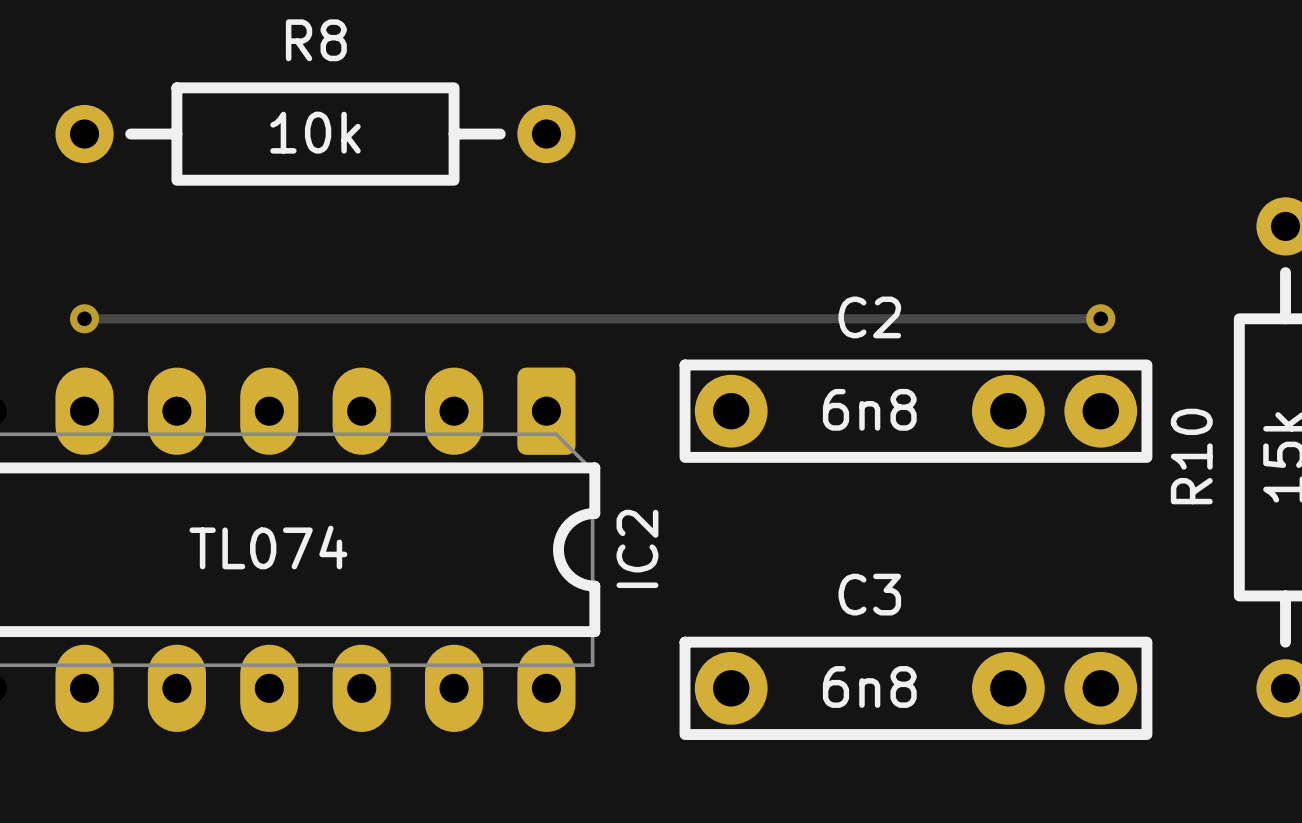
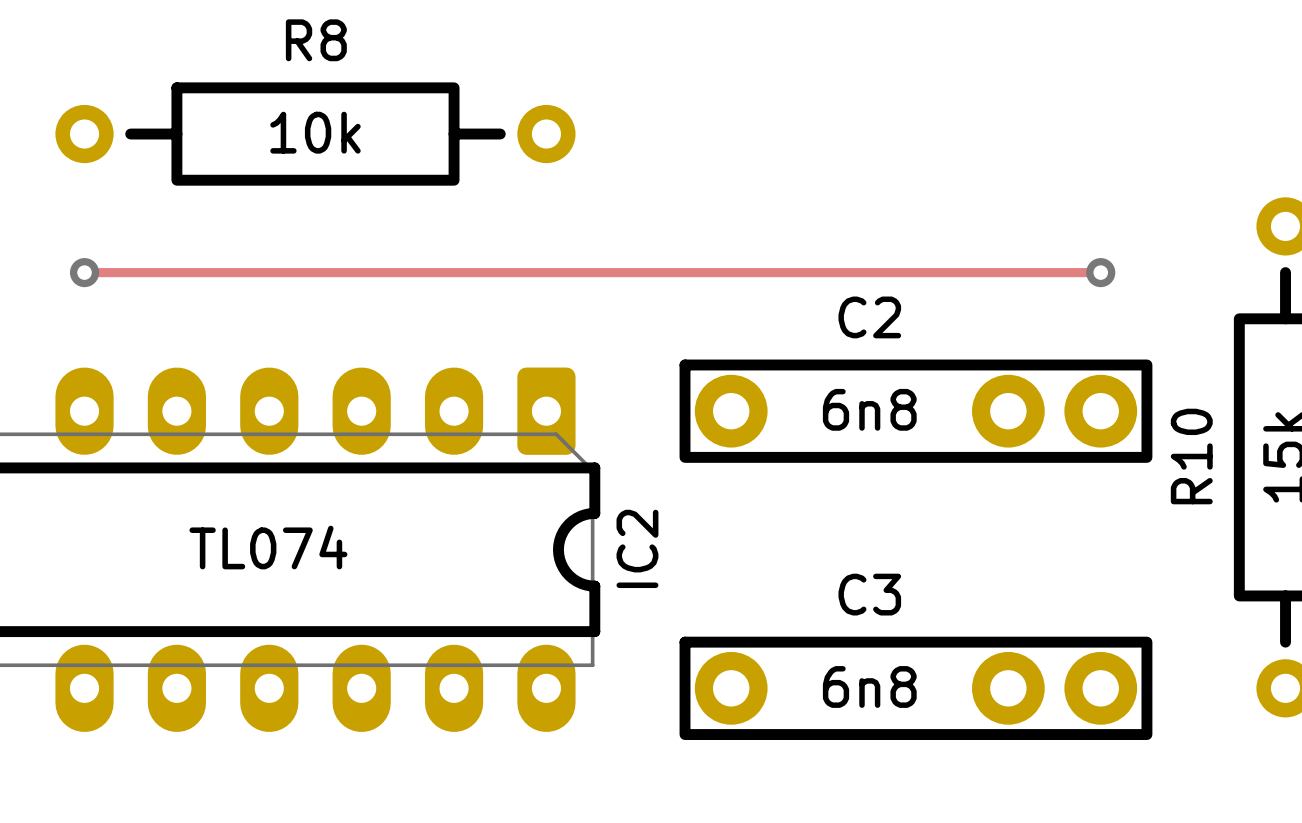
track: (84, 318) (1100, 318) -> (84, 272) (1100, 272)
via position: (84, 318) -> (84, 272)
via position: (1100, 318) -> (1100, 272)

